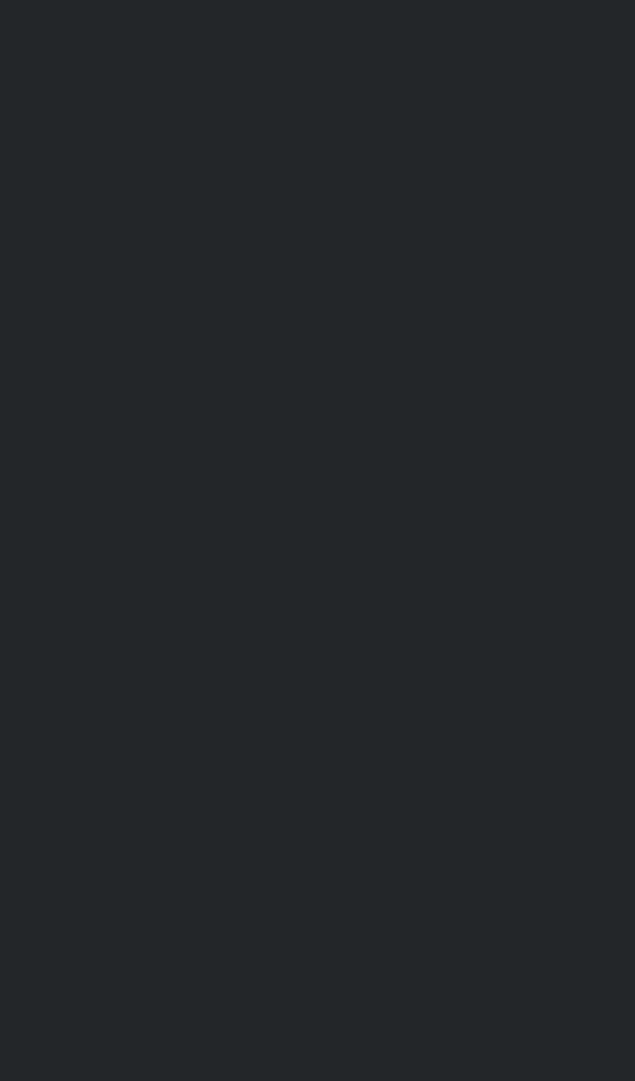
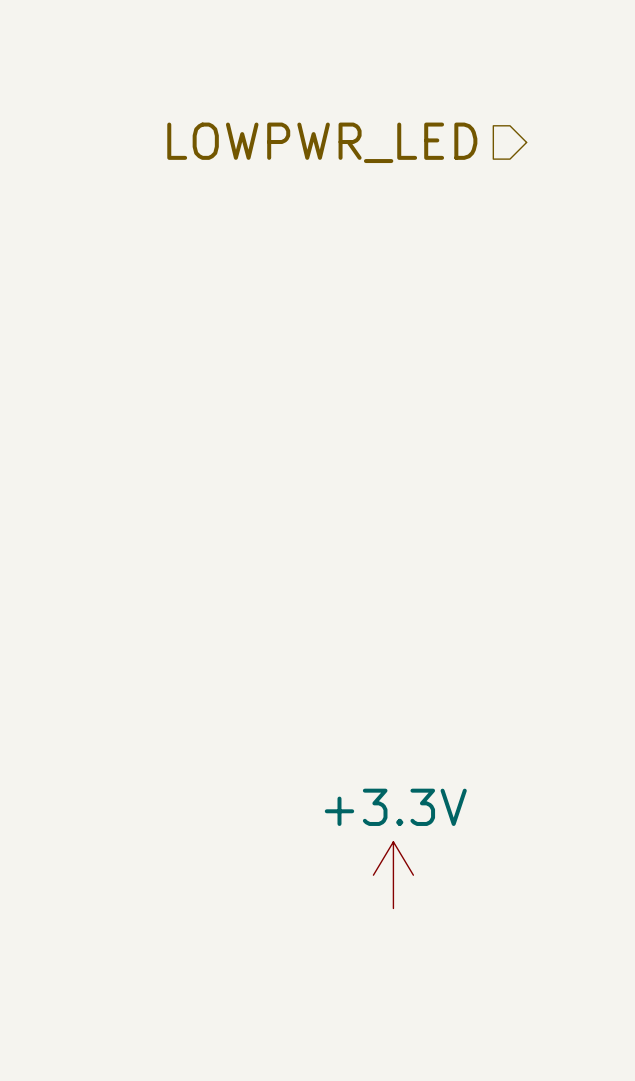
hierarchical label: none -> LOWPWR_LED (322, 142)
power symbol: none -> +3.3V (393, 875)

